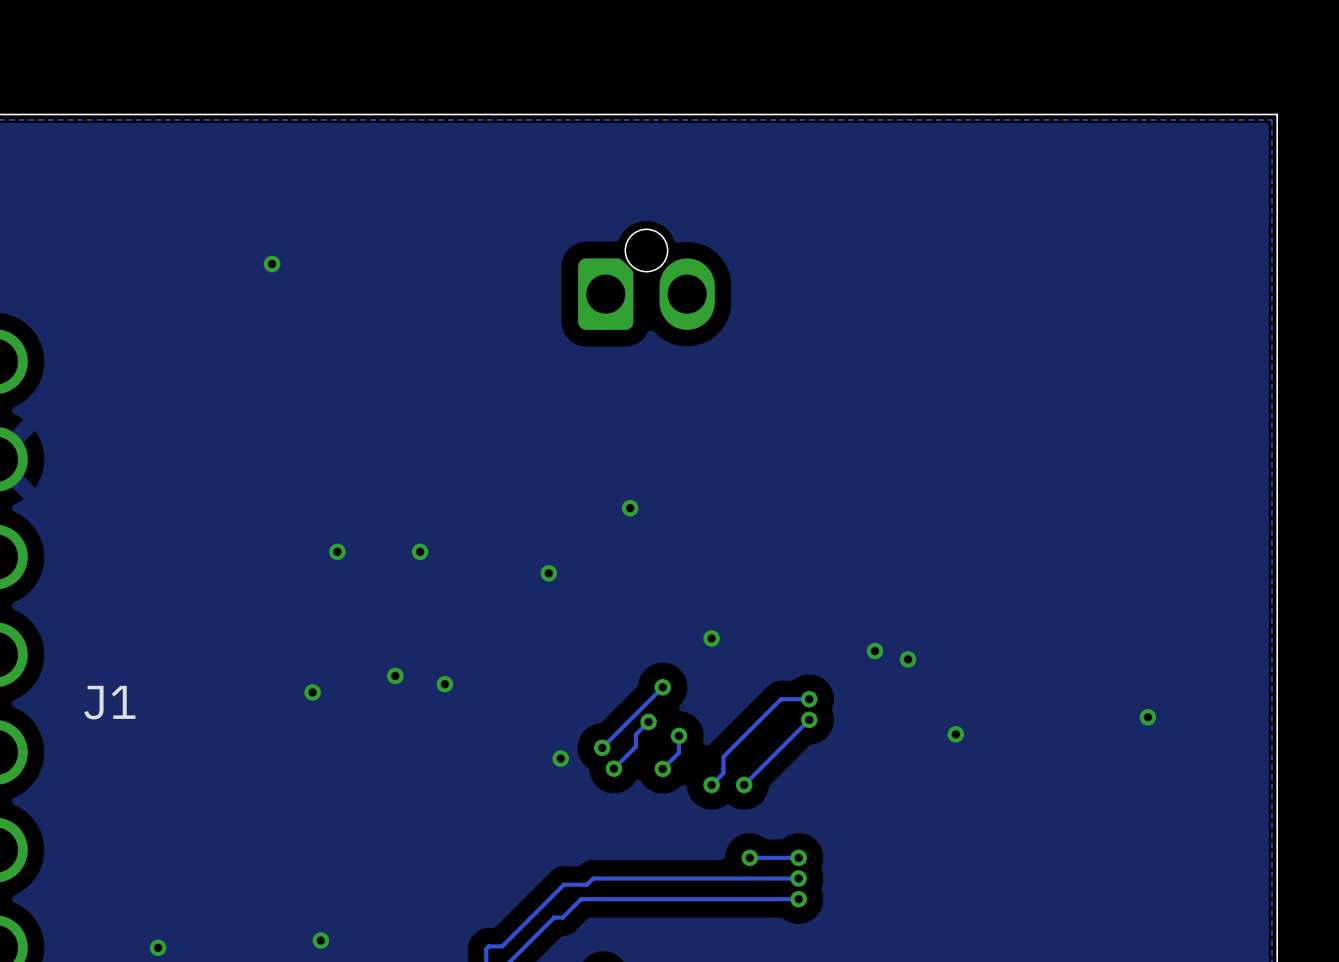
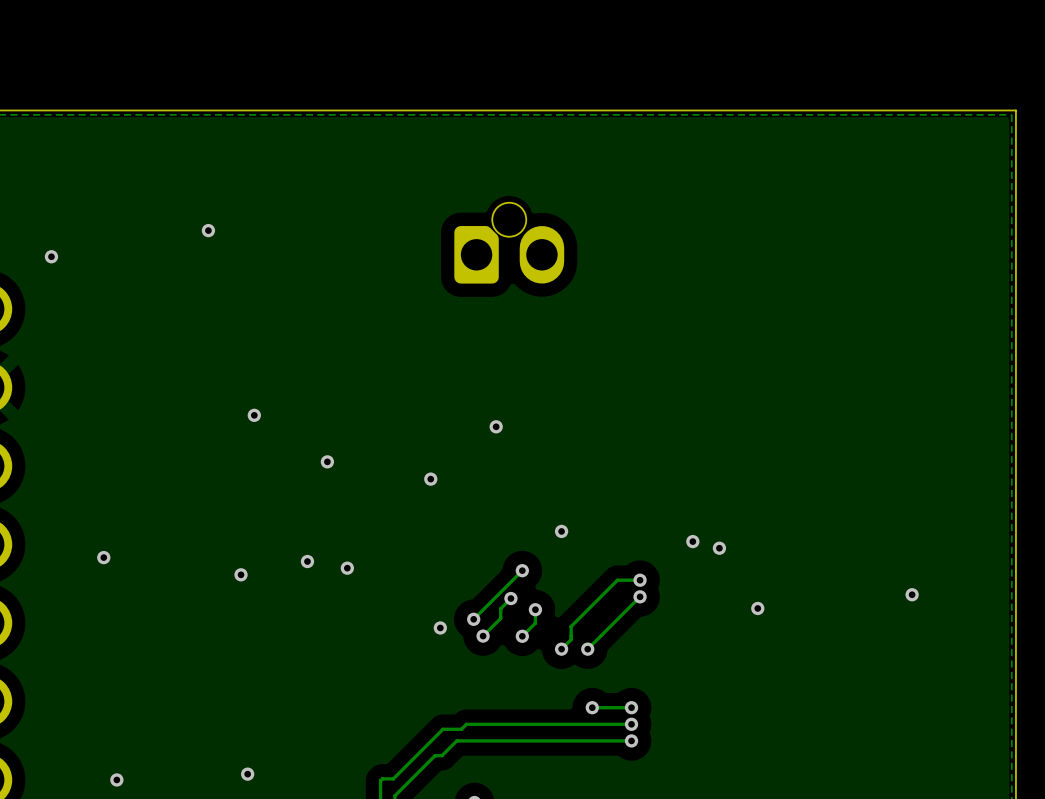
via: none -> (51, 256)
via position: (337, 551) -> (254, 415)
via: none -> (103, 557)

